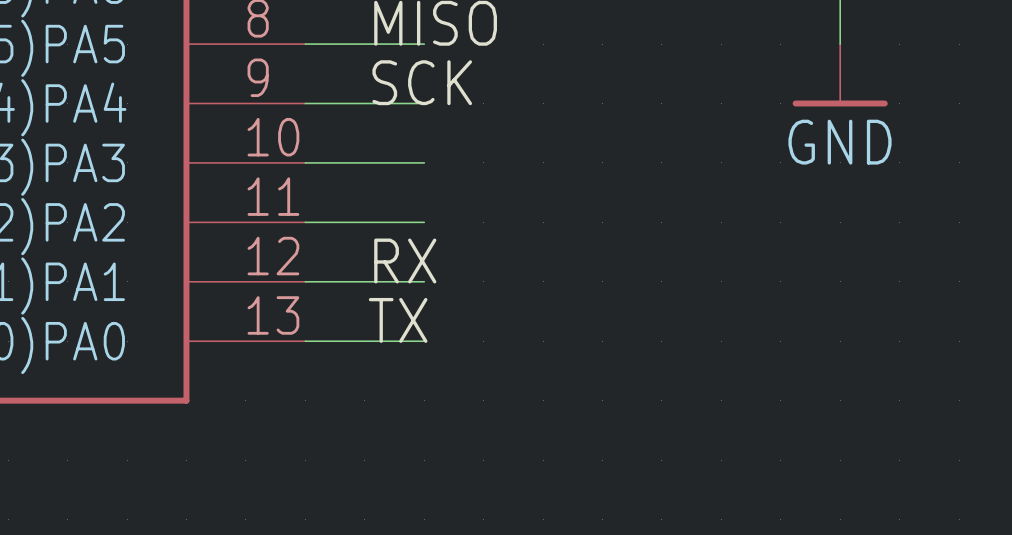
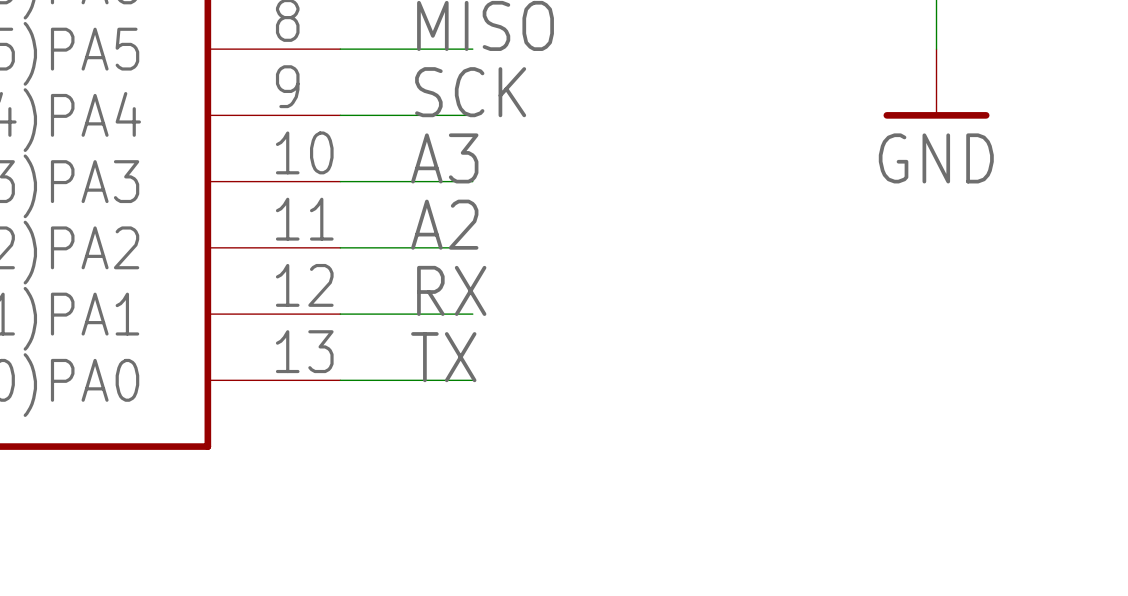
label: none -> A3 (444, 158)
label: none -> A2 (444, 224)

